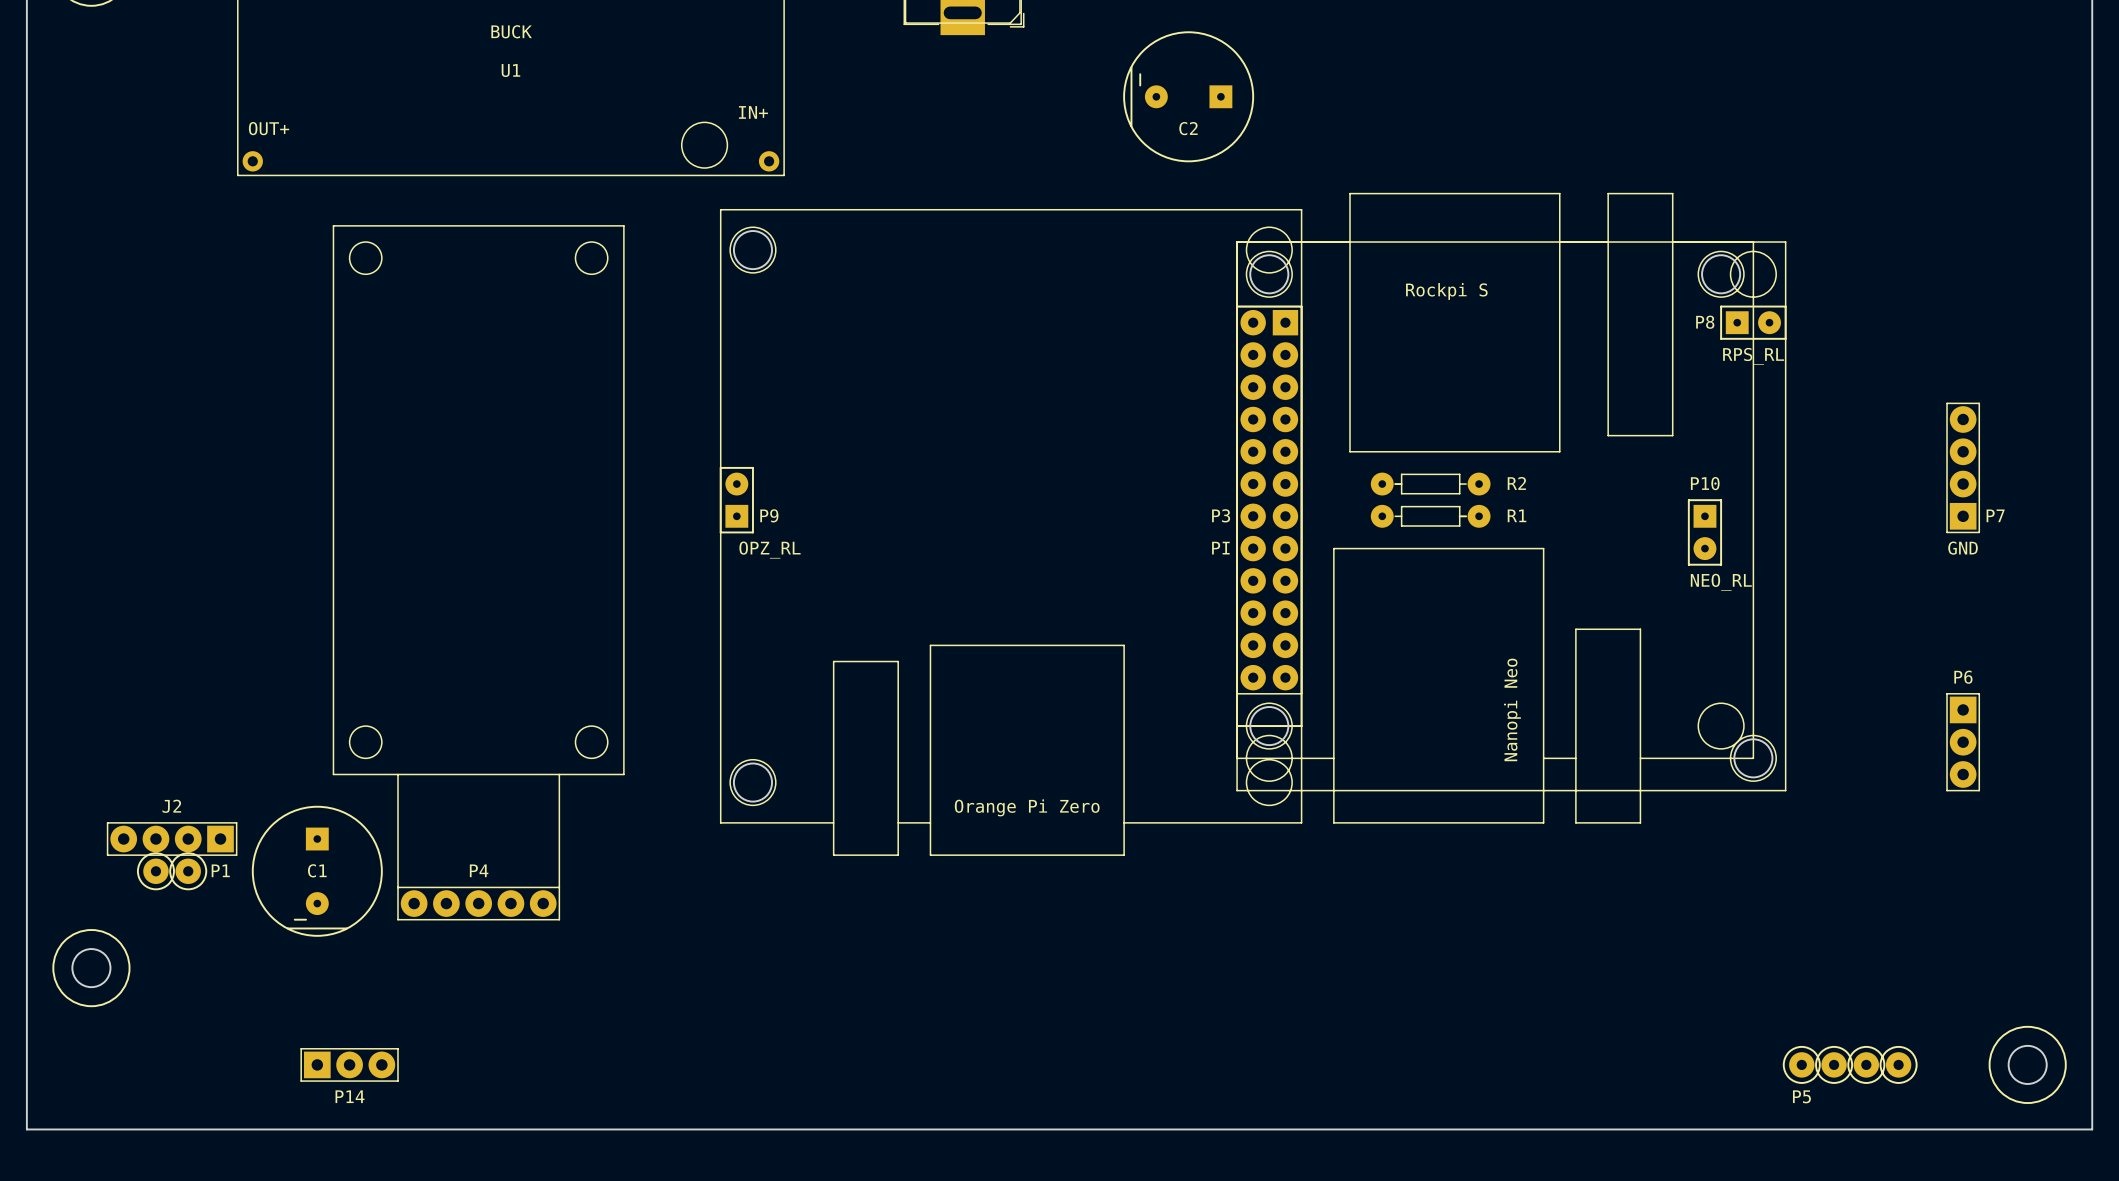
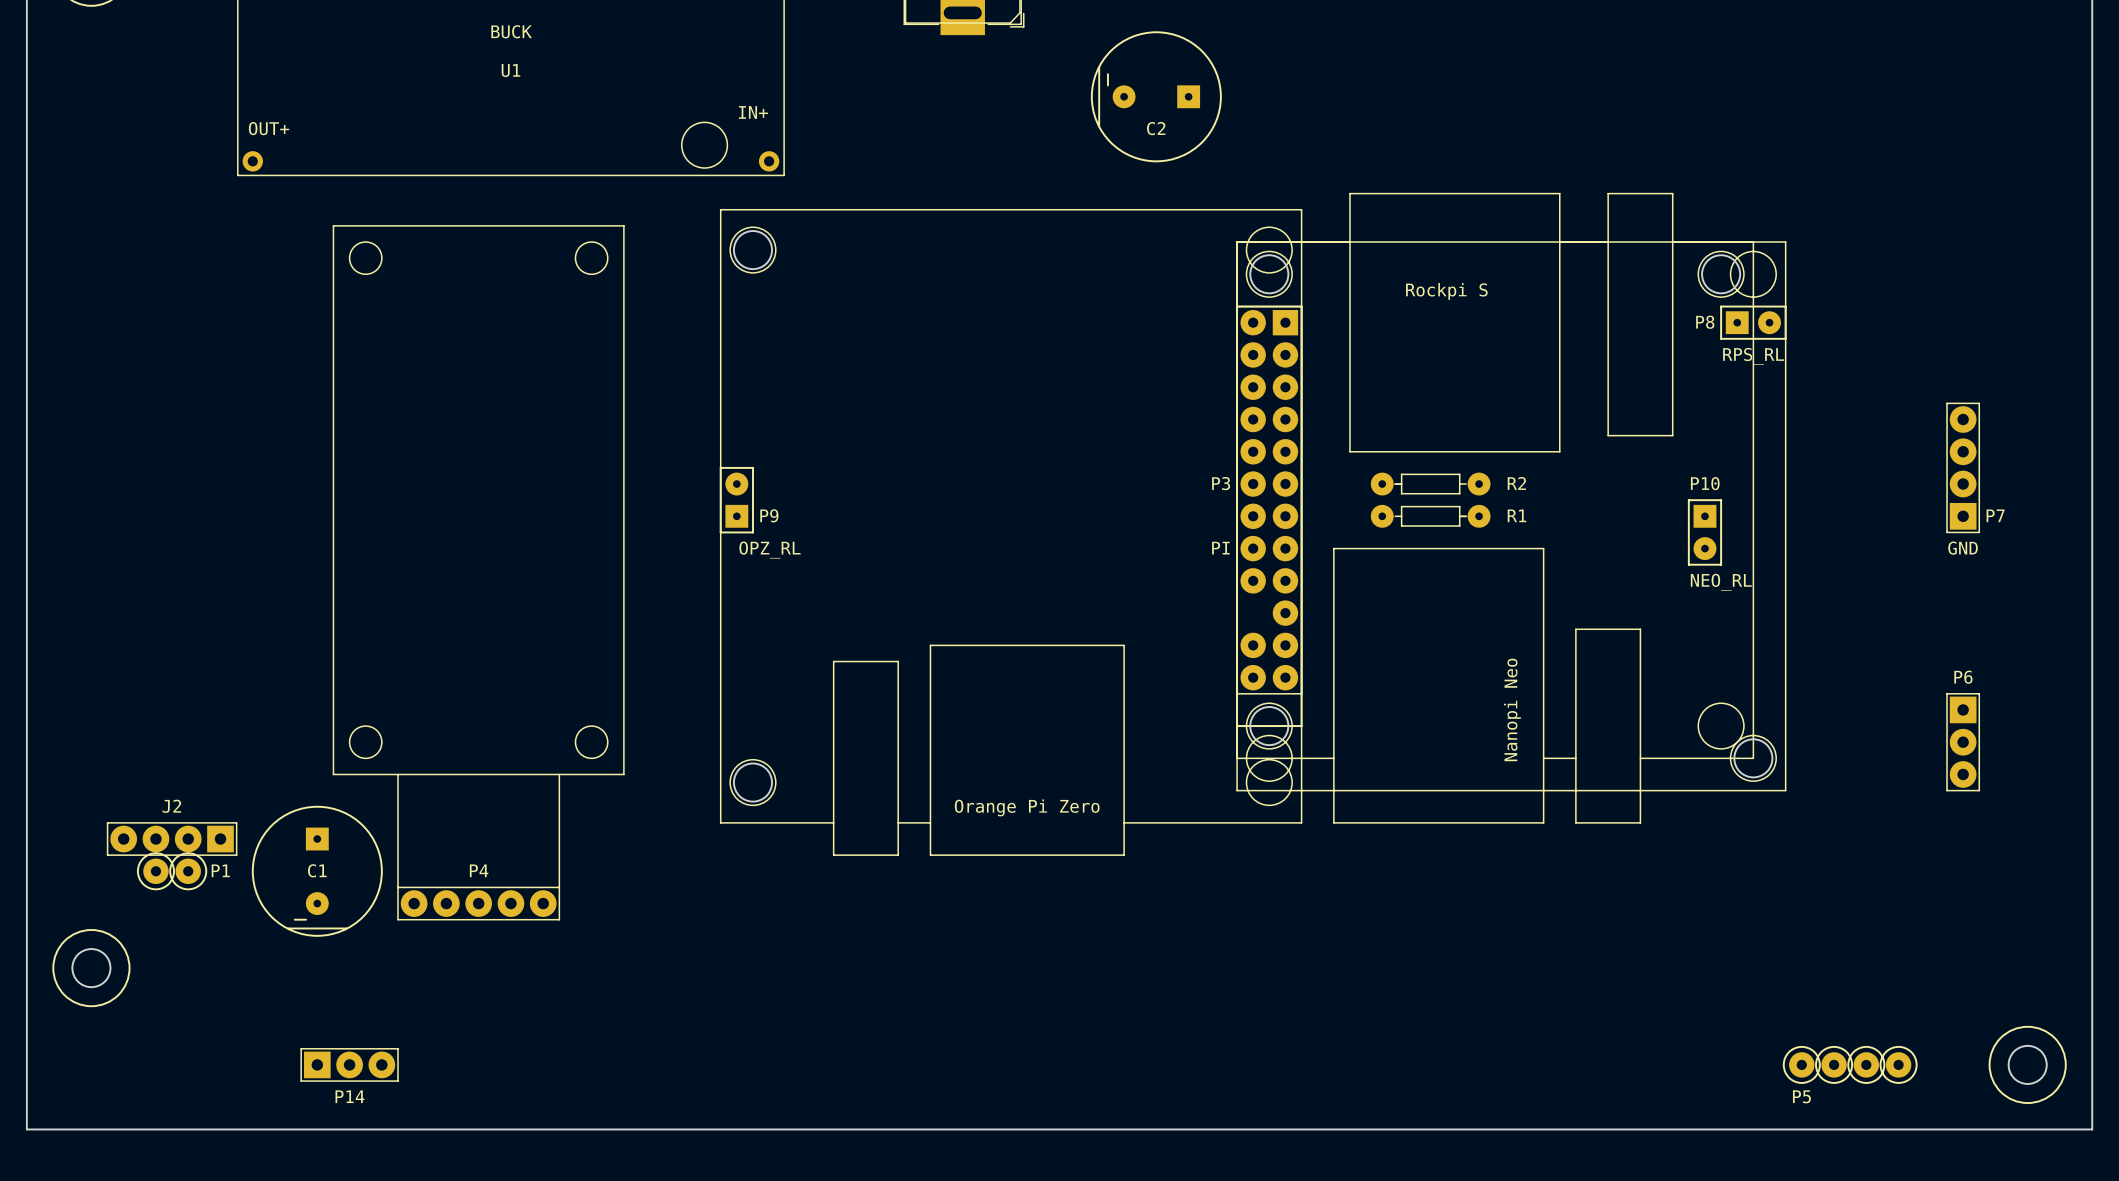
C2 position: (1188, 96) -> (1156, 96)
P3 footprint: [719, 192, 1787, 856] -> [719, 192, 1787, 856]
P3 name position: P3 (1221, 515) -> P3 (1221, 483)

